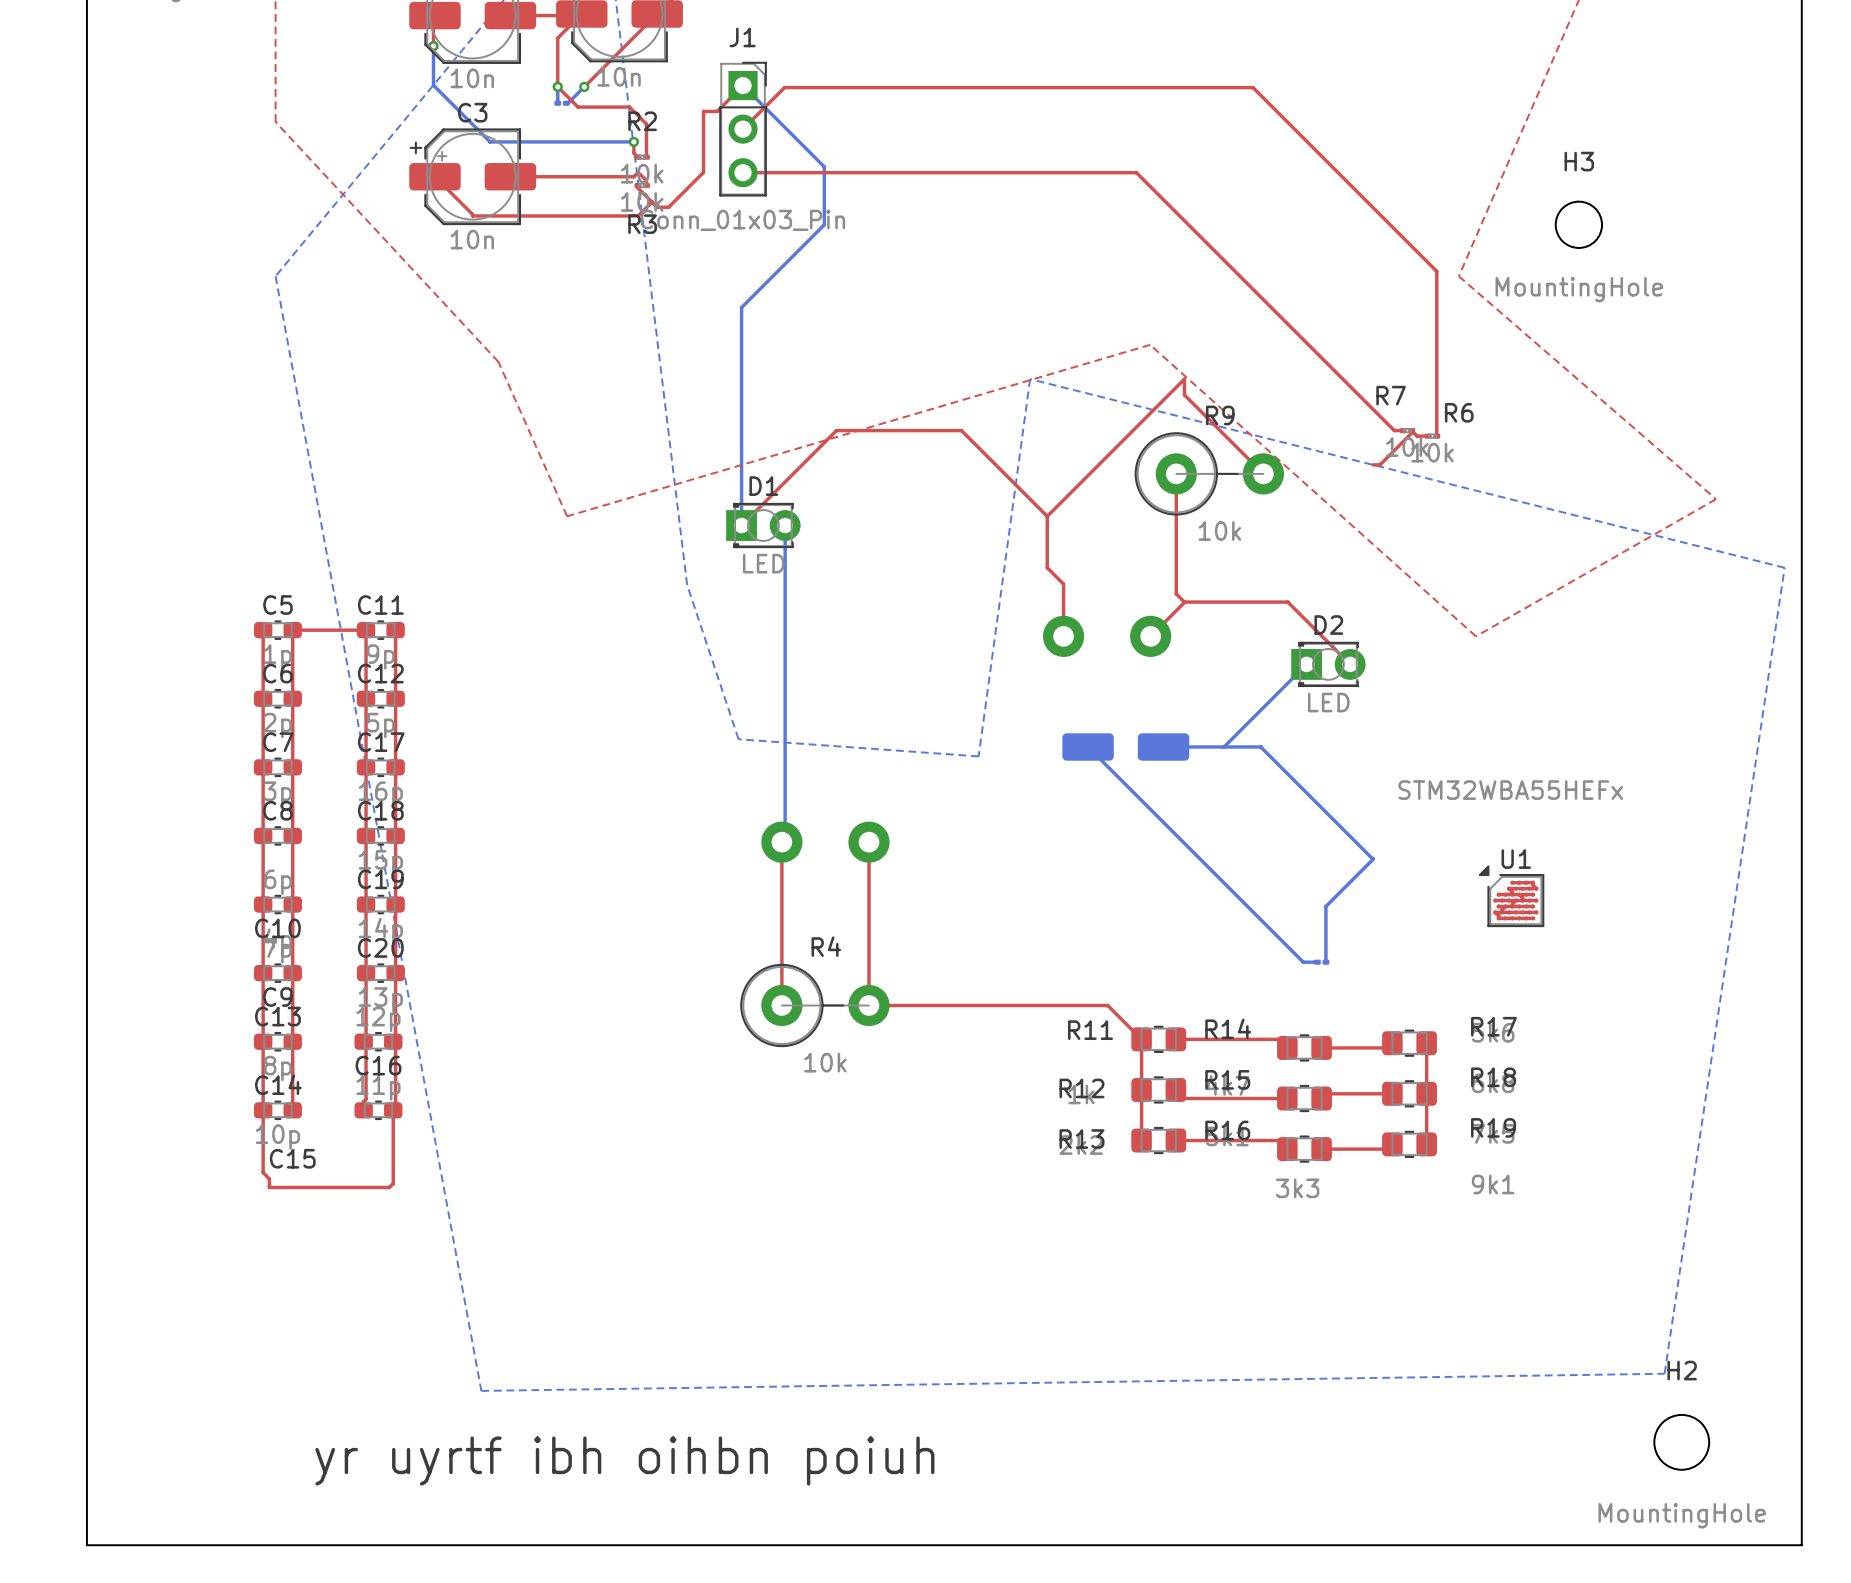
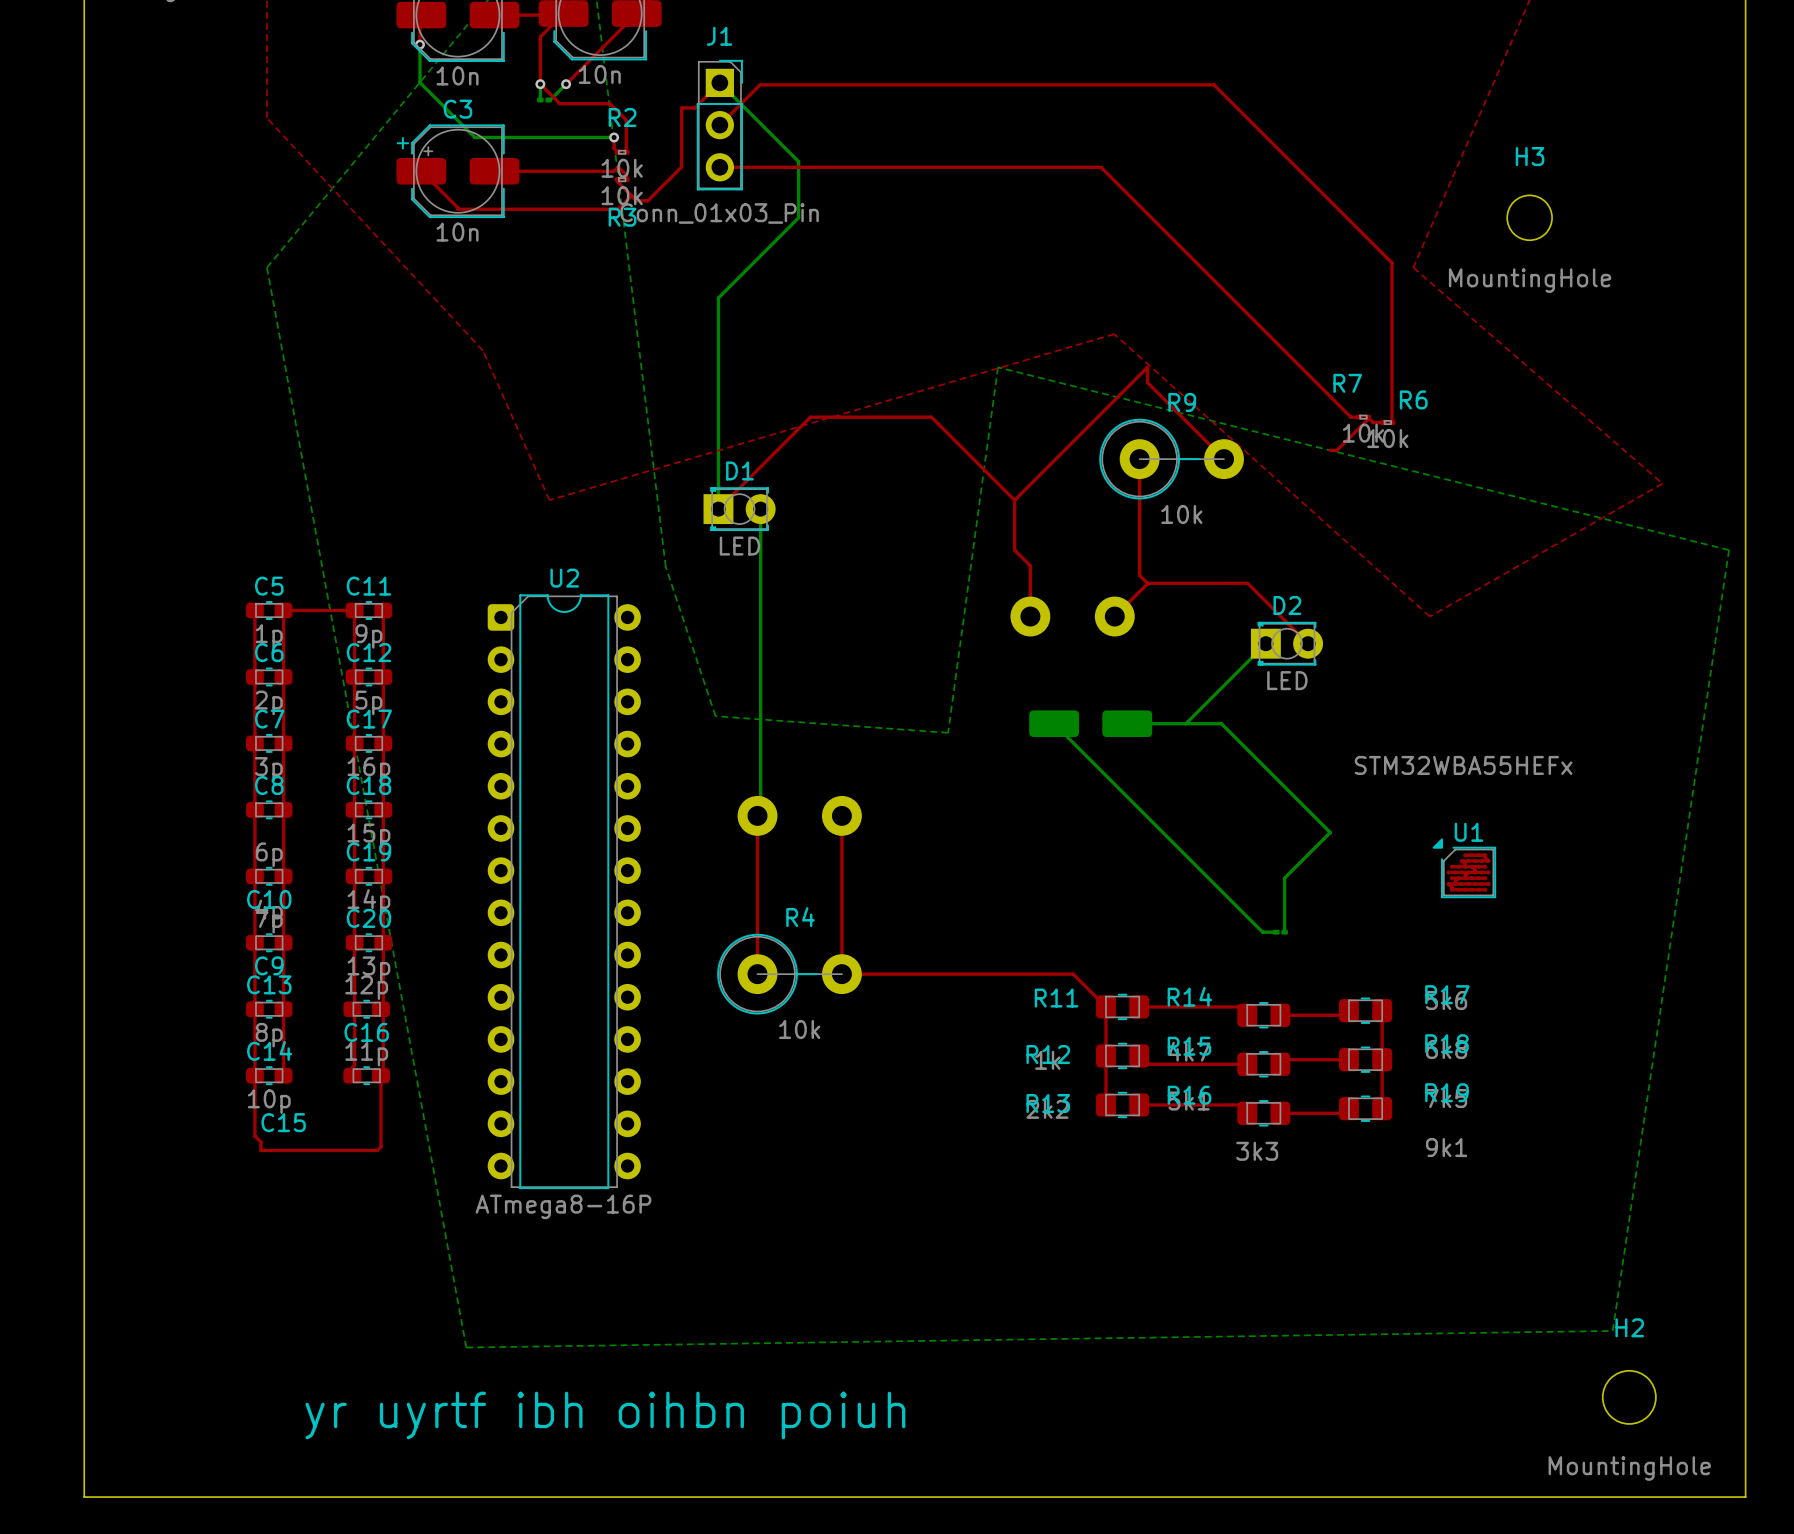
U2: none -> ATmega8-16P (564, 891)

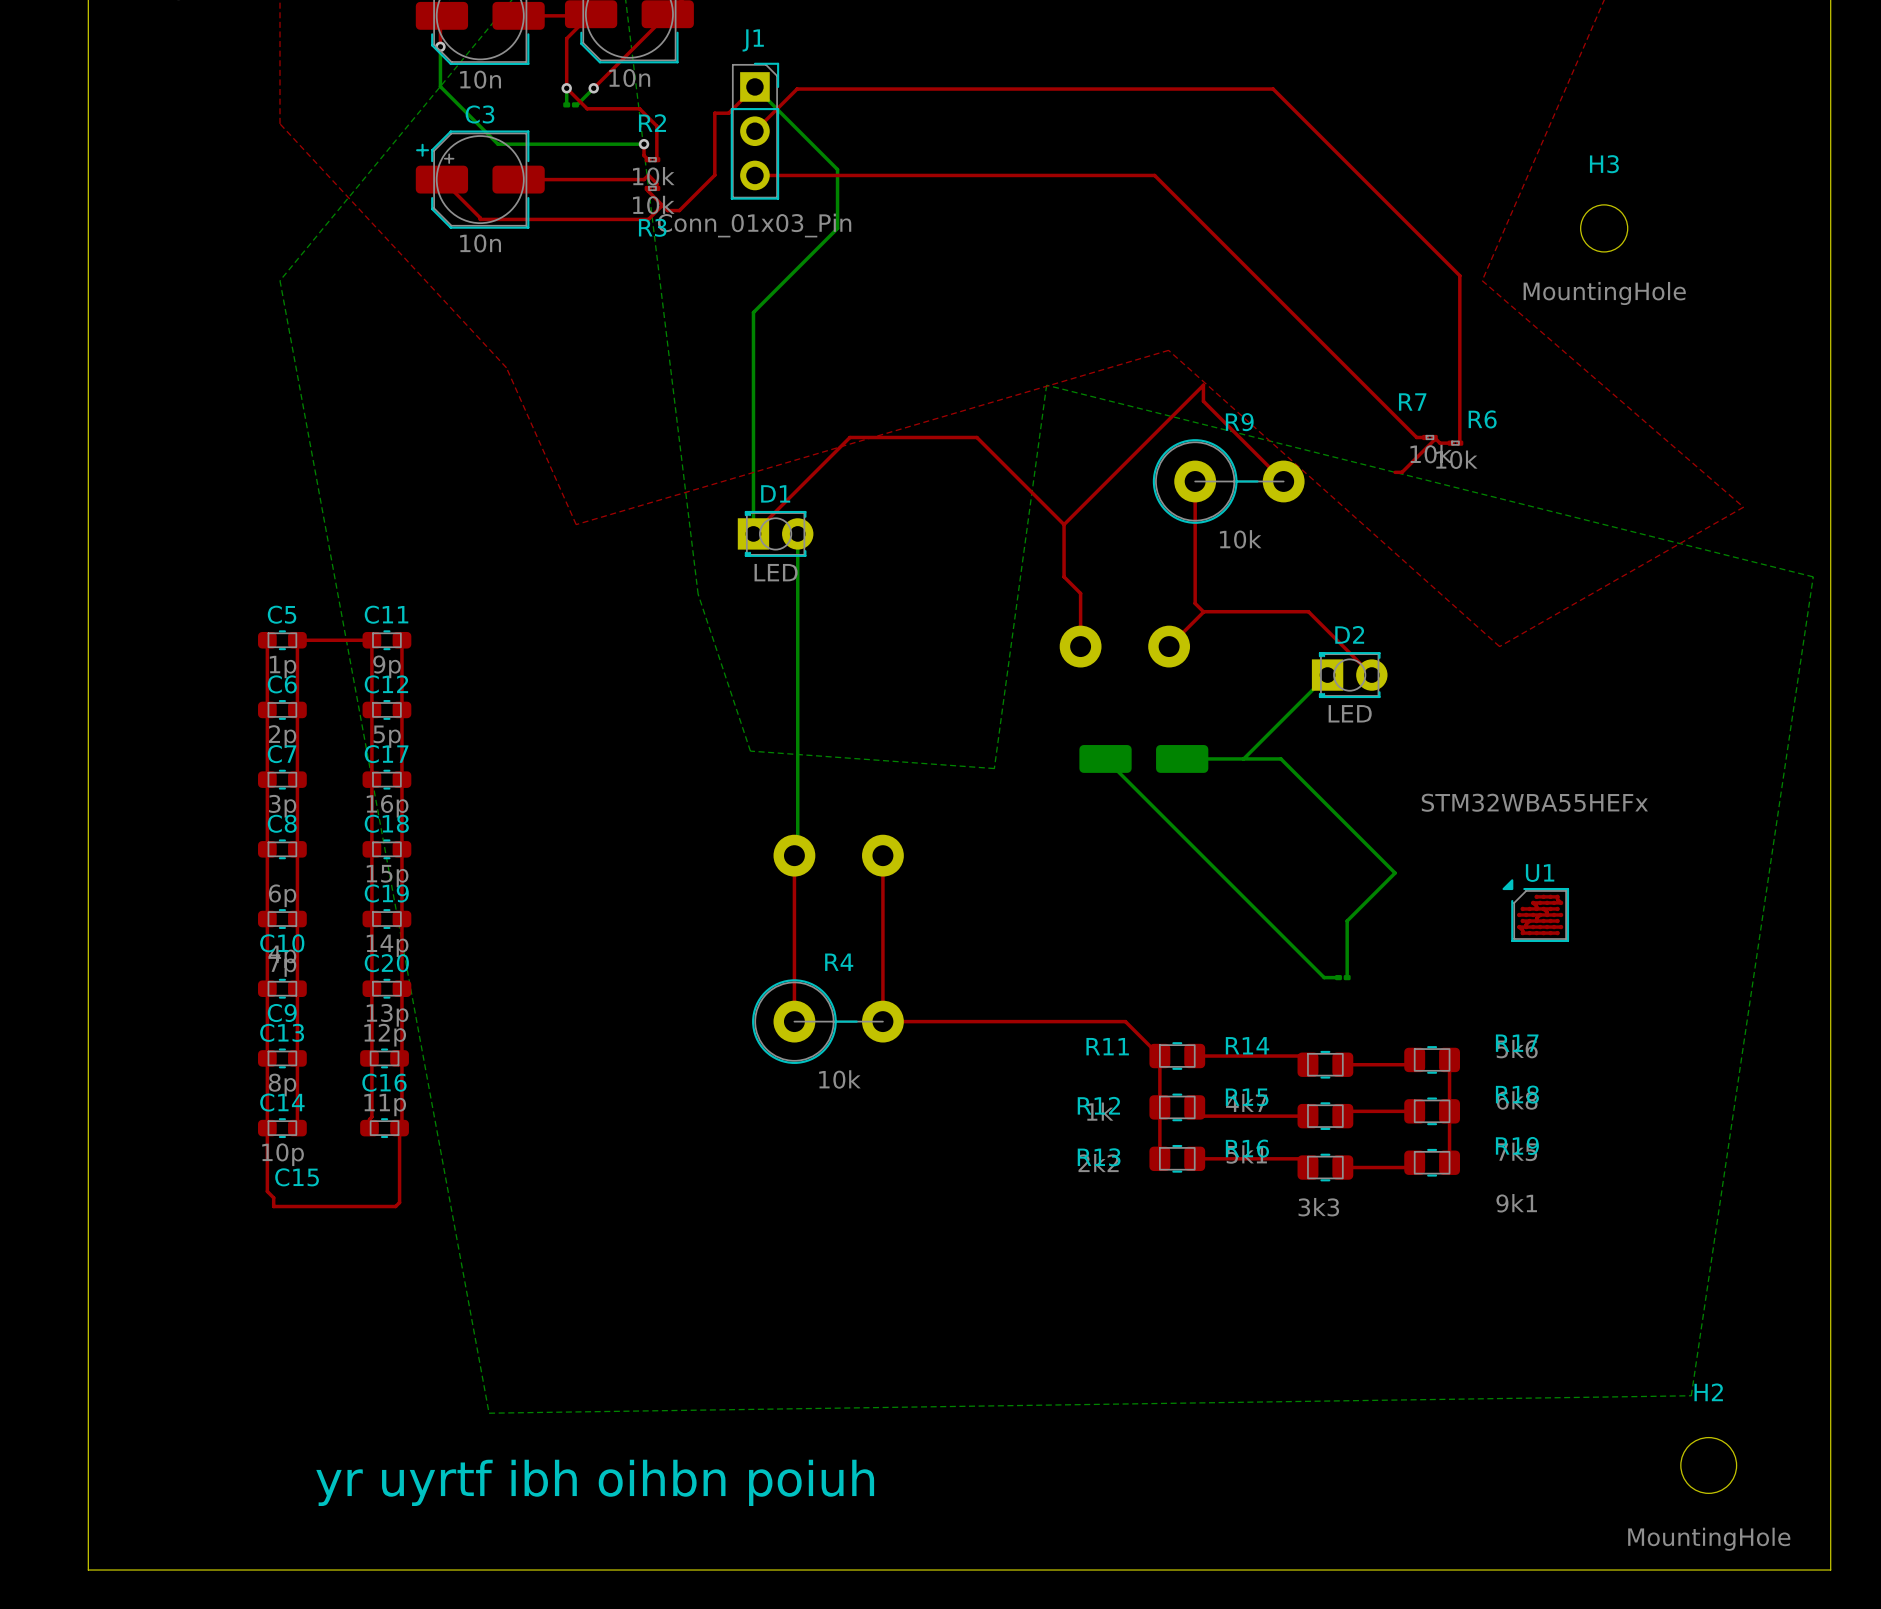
U2: ATmega8-16P (564, 891) -> none

